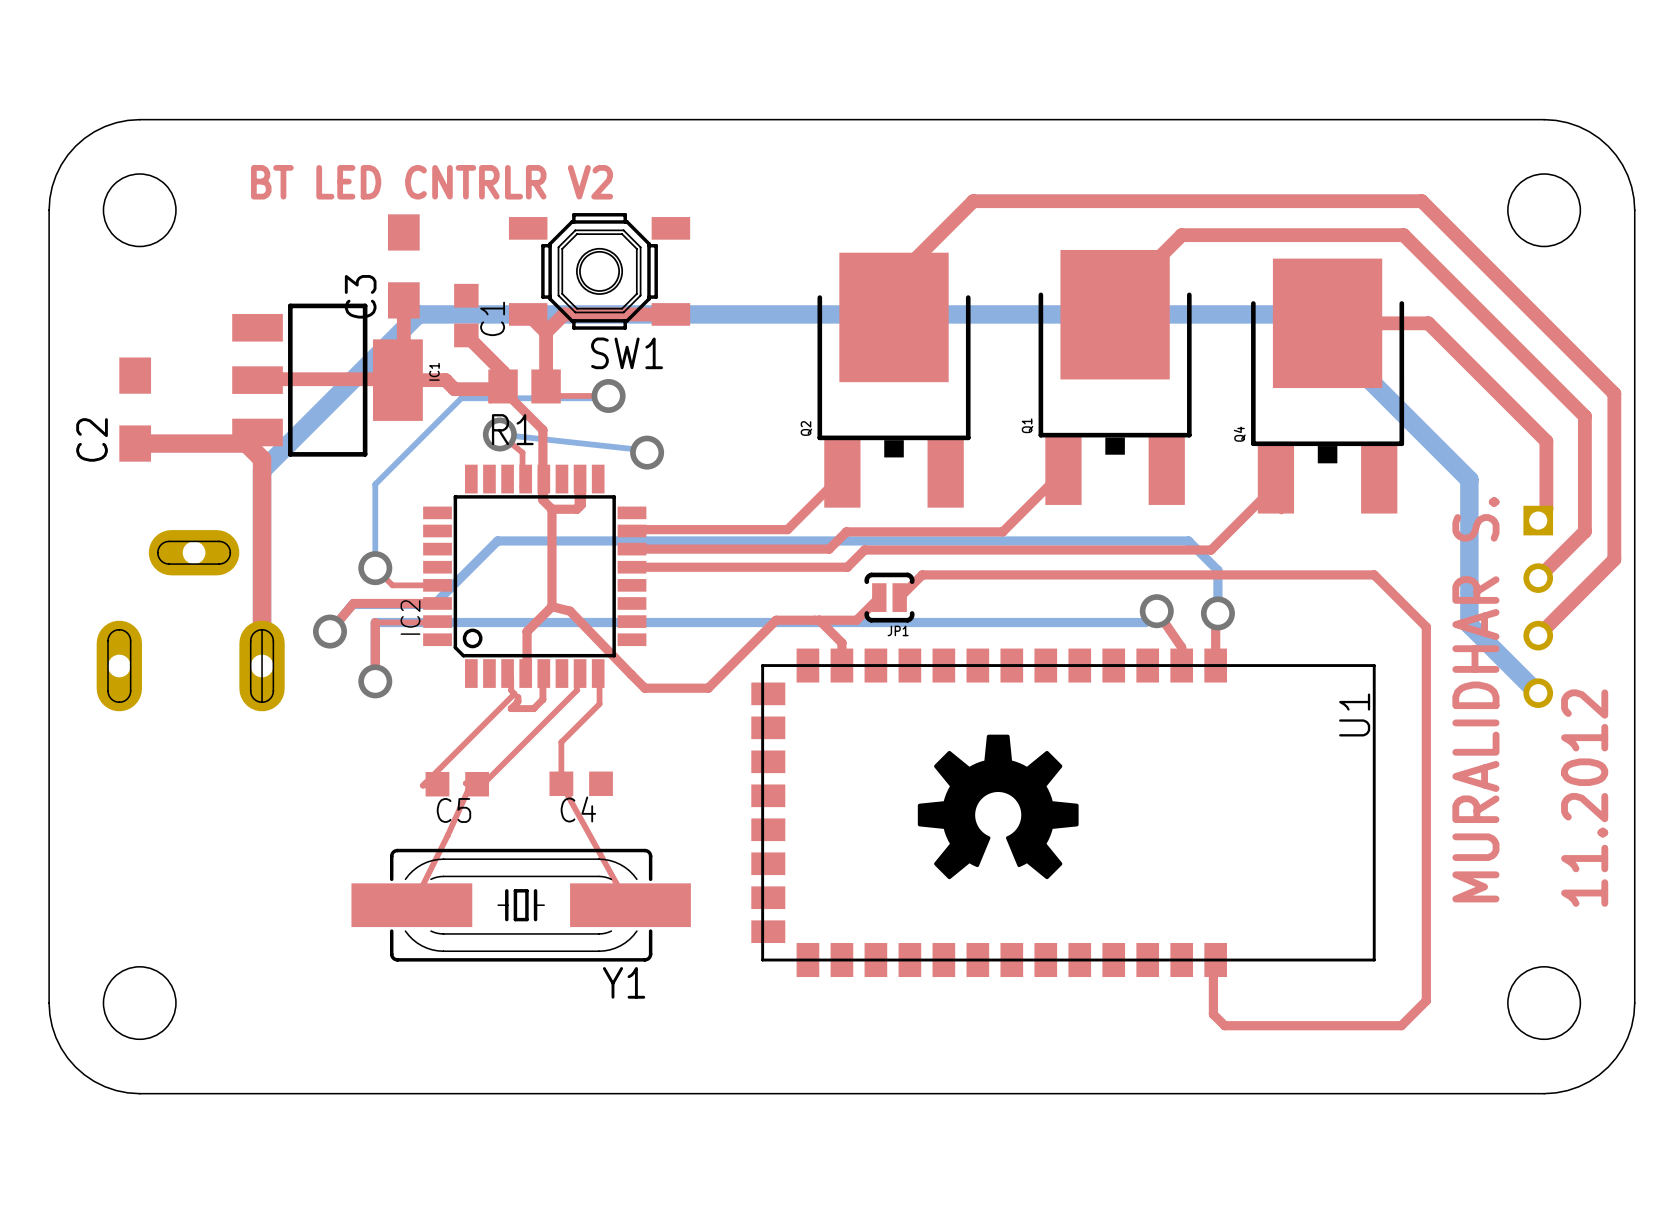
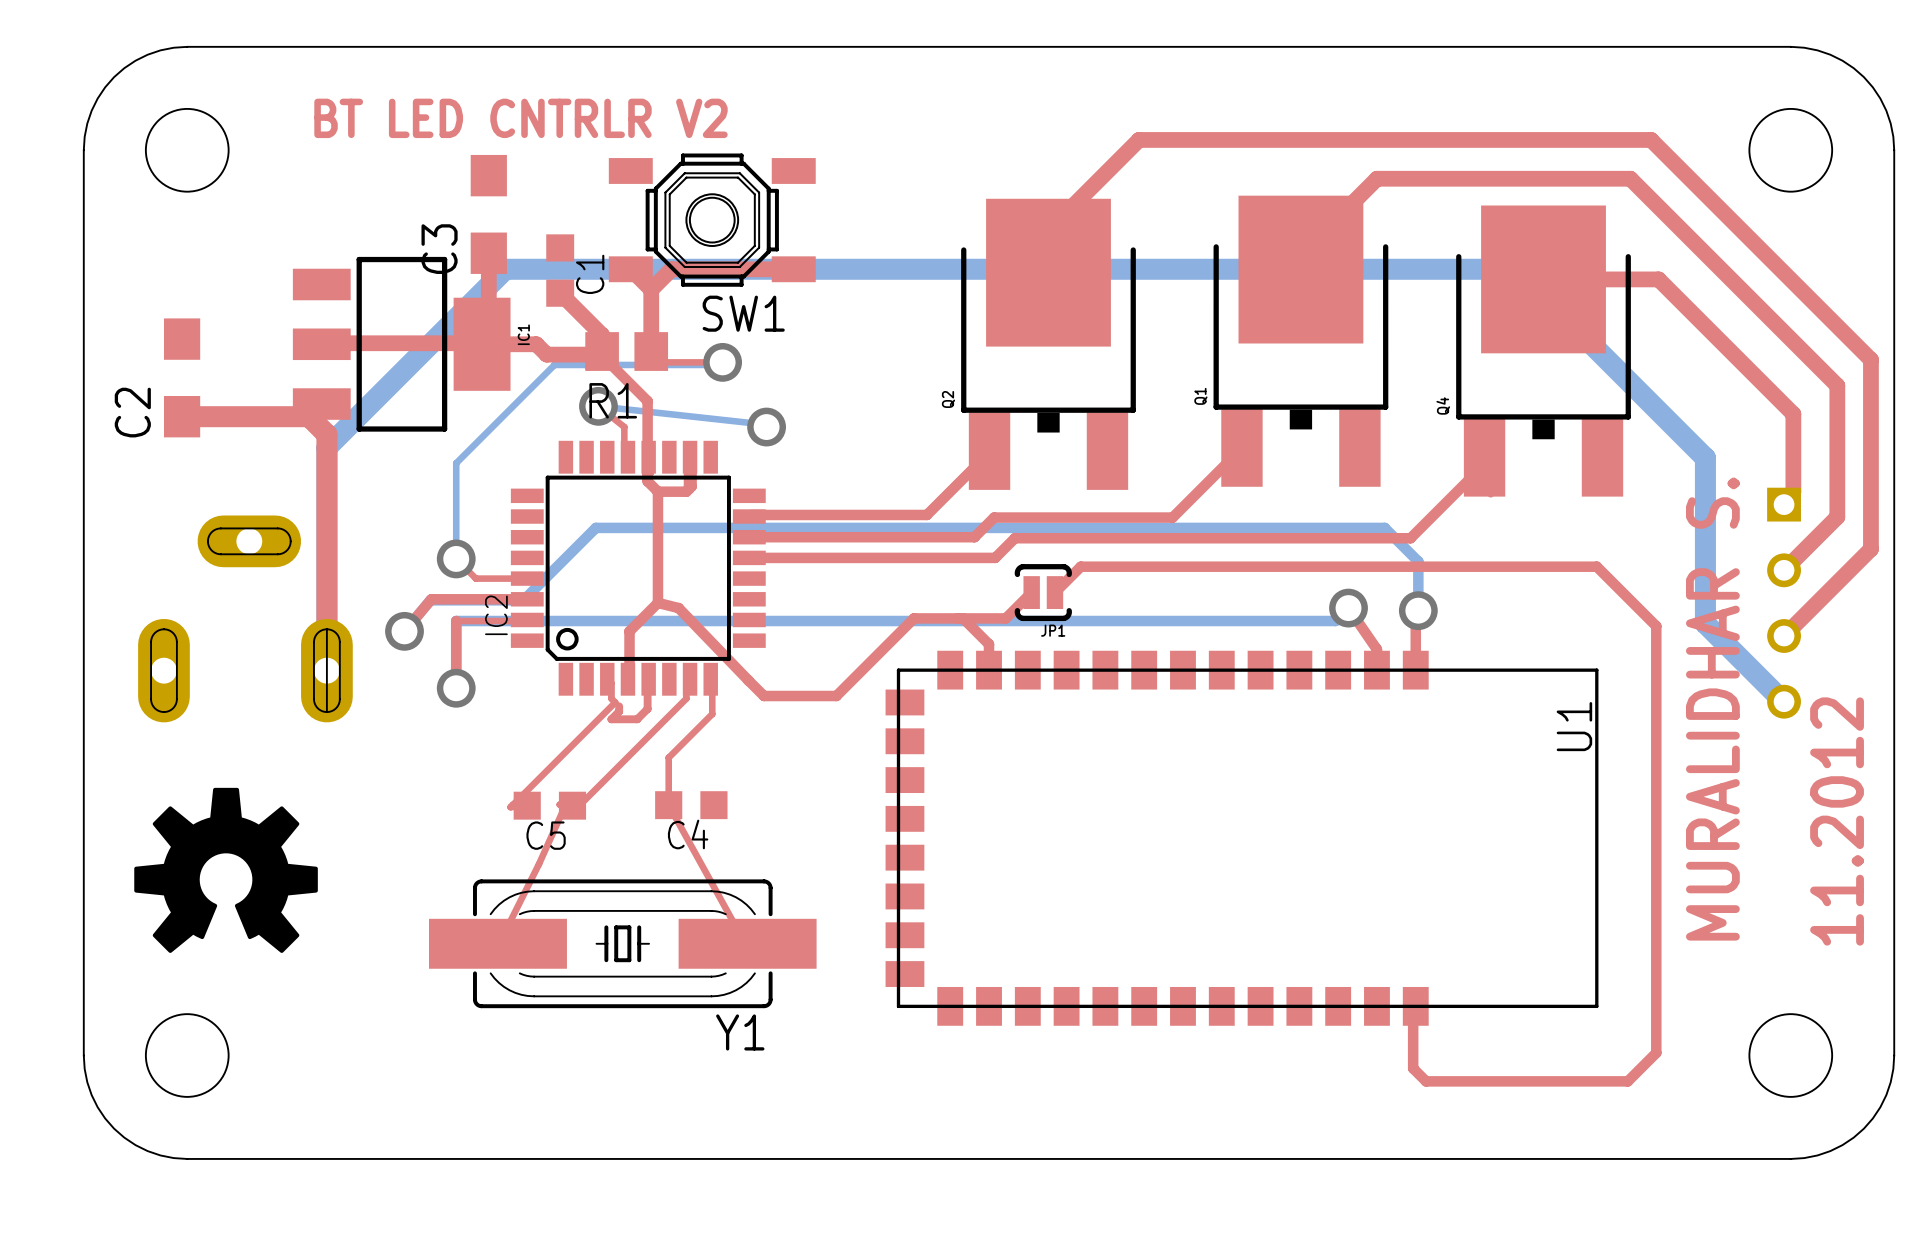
drawing: [917, 734, 1079, 880] -> none
drawing: none -> [134, 787, 318, 953]

